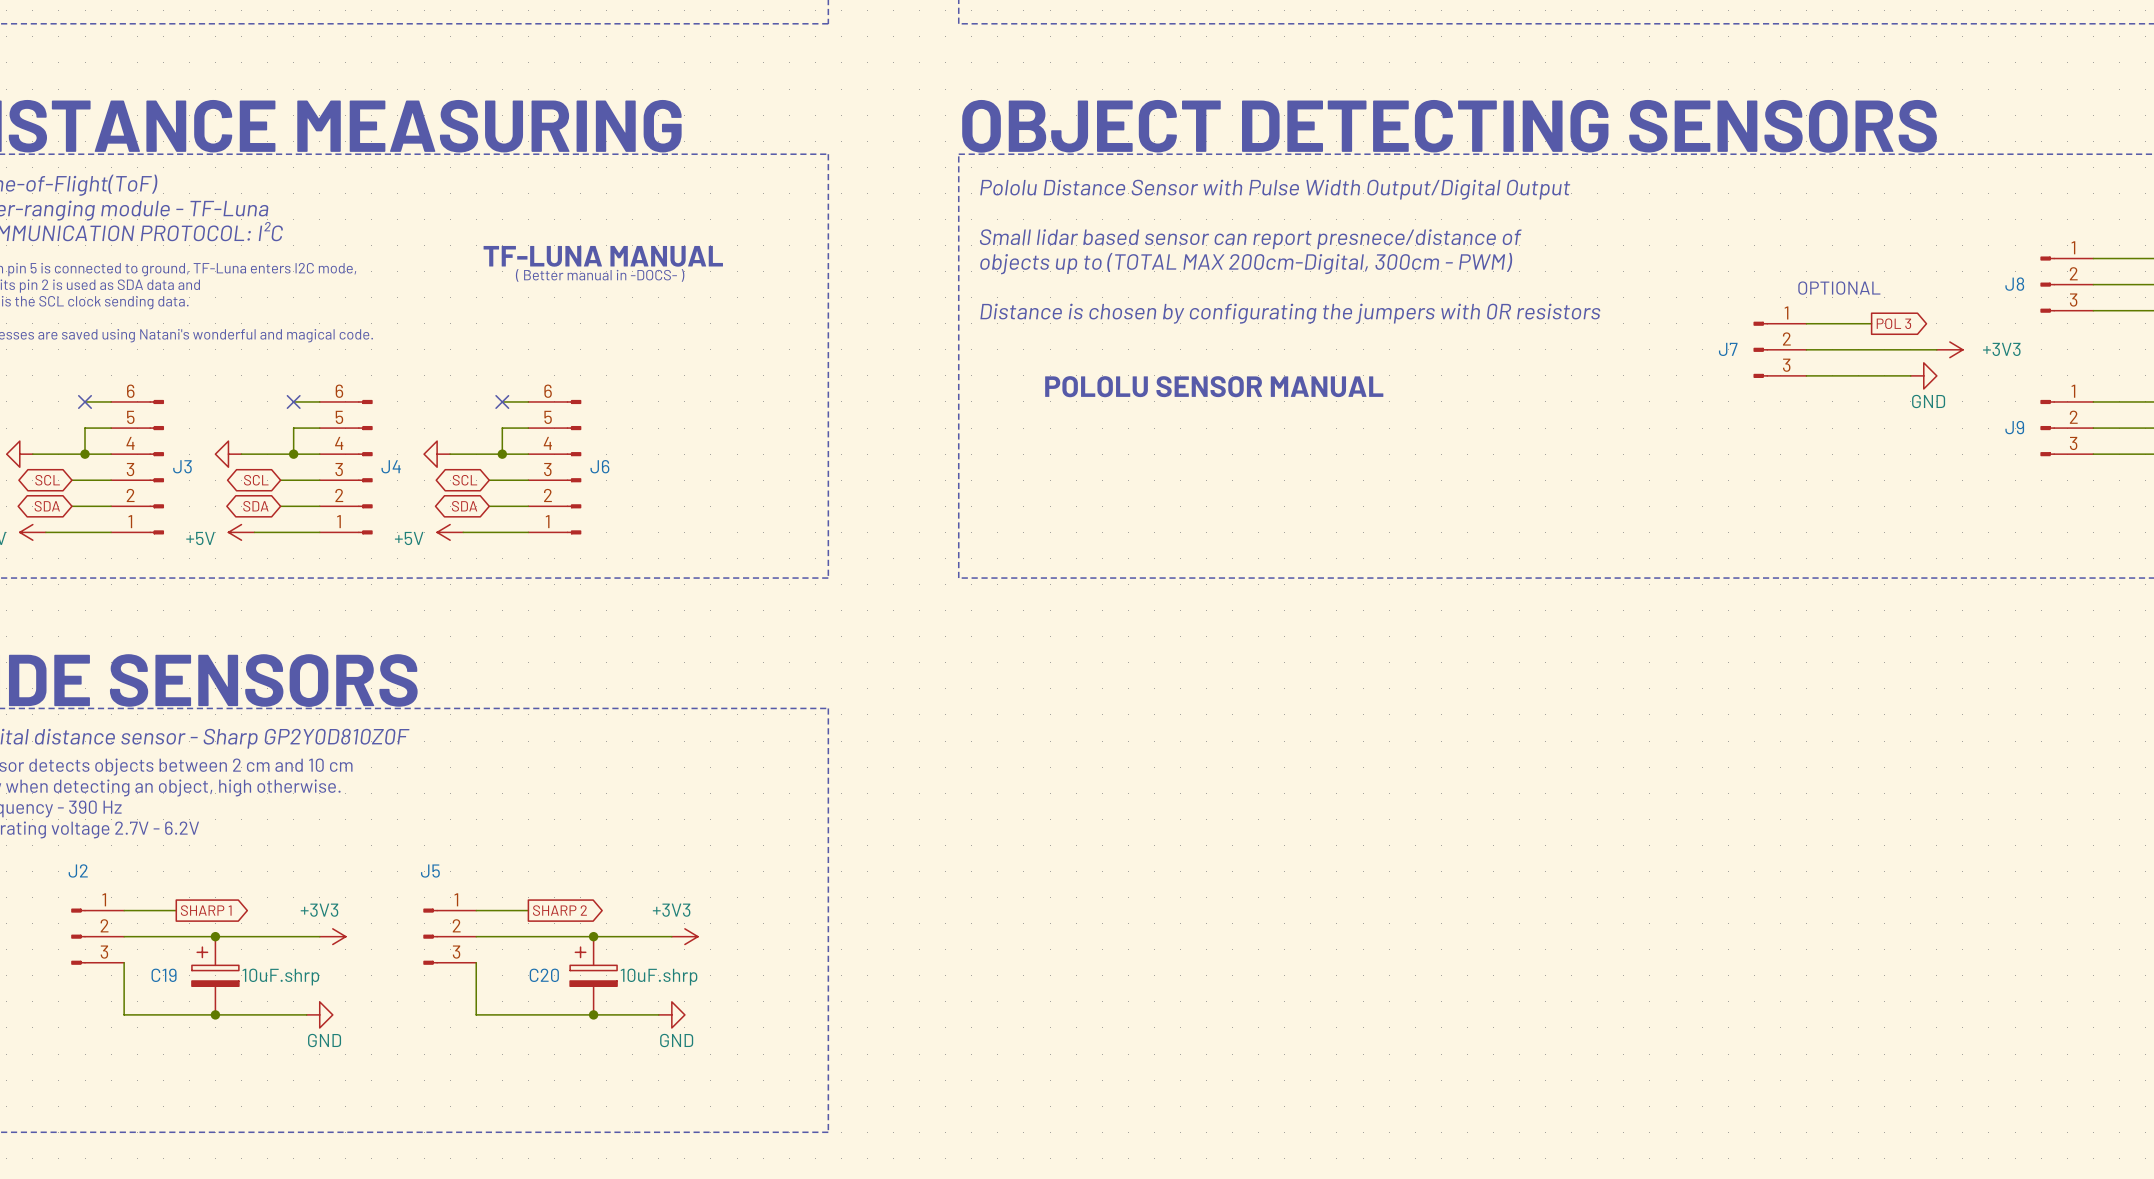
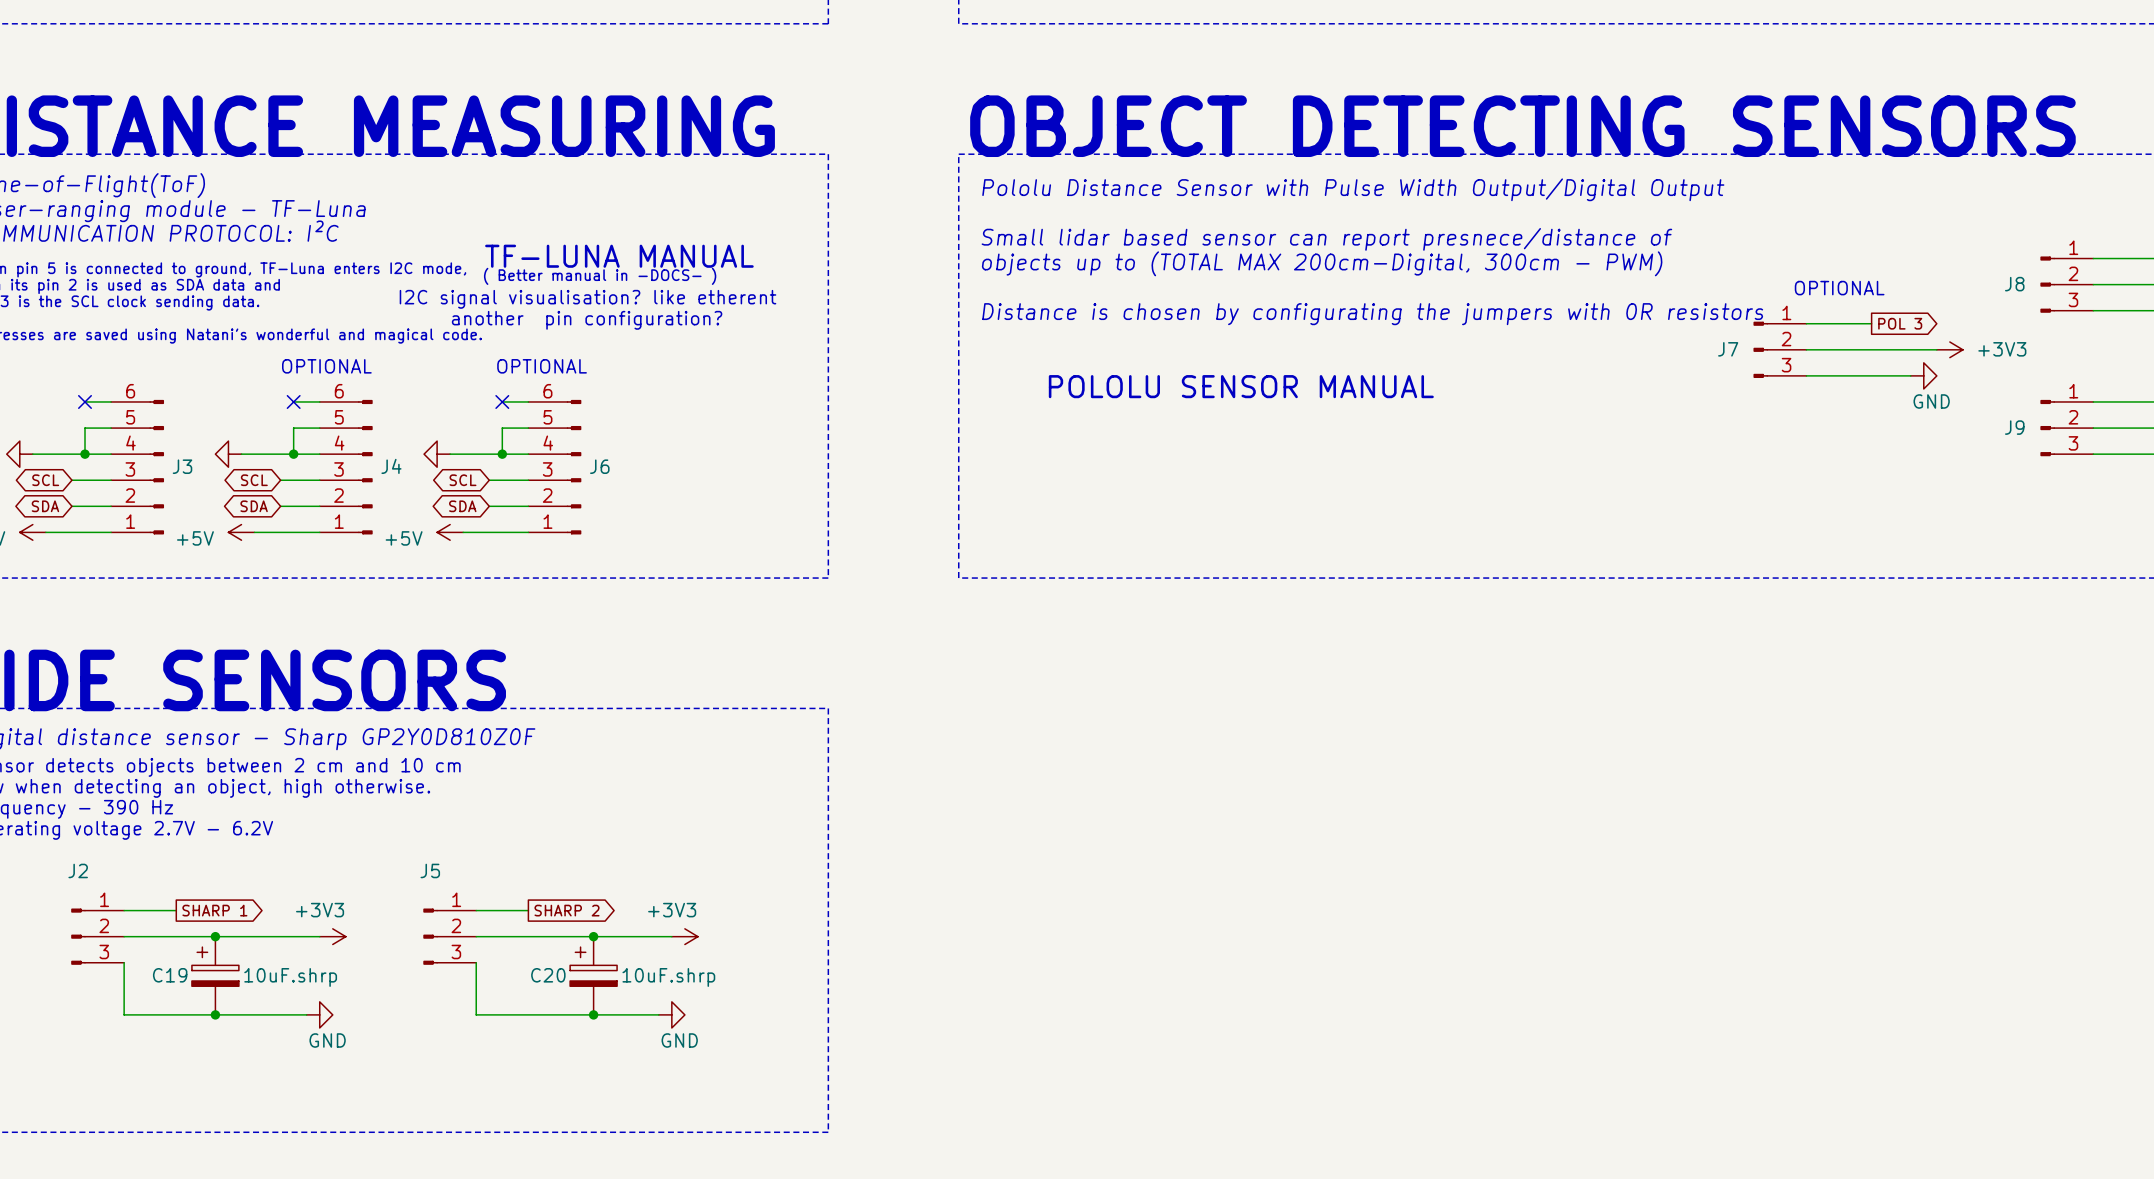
text: none -> I2C signal visualisation? like etherent (588, 299)
text: none -> another pin configuration? (587, 320)
text: none -> OPTIONAL (326, 366)
text: none -> OPTIONAL (542, 366)

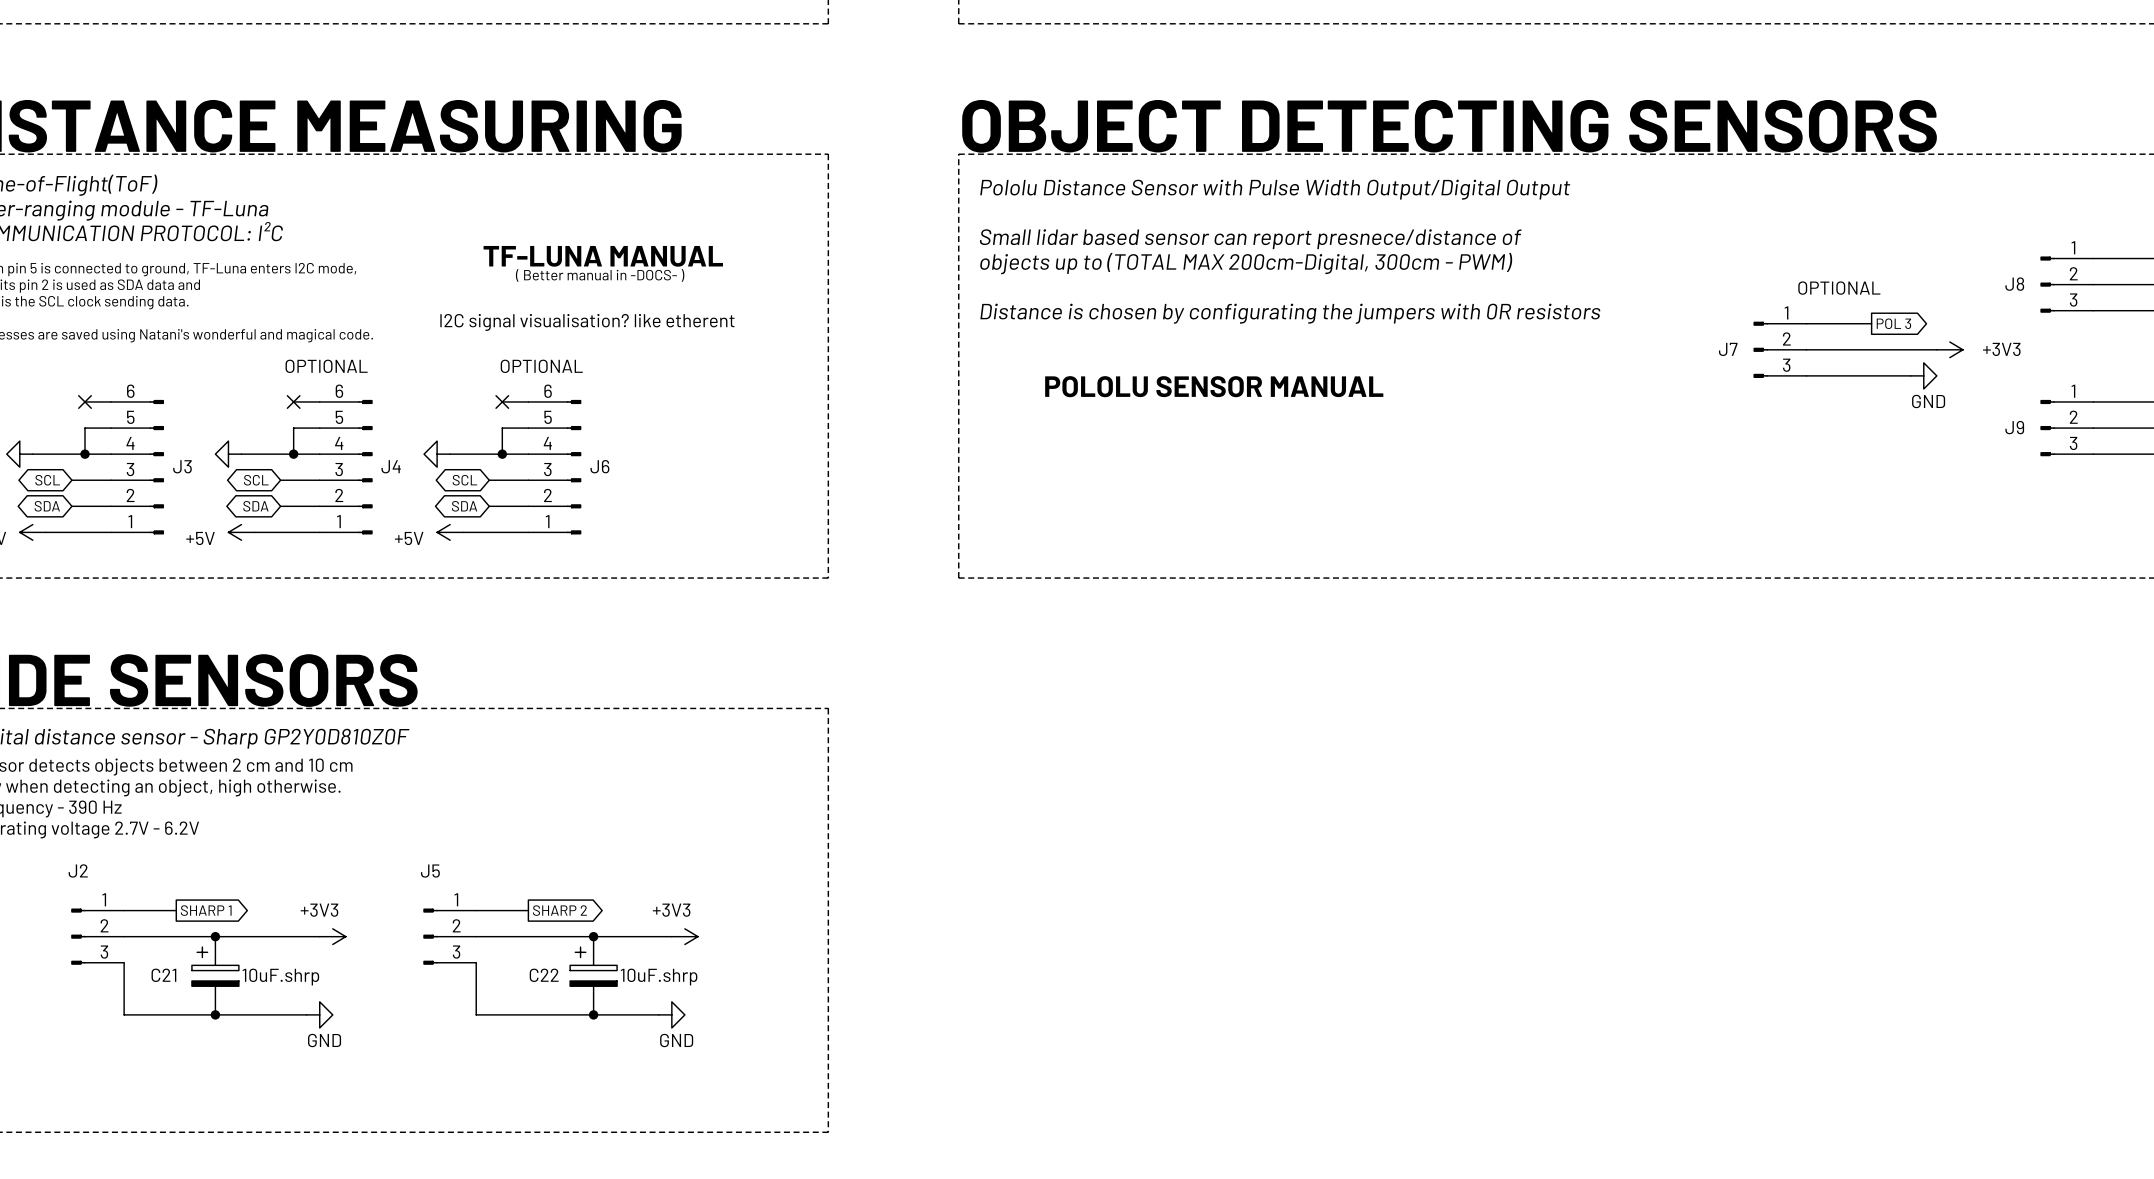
text: I2C signal visualisation? like etherent (588, 299) -> none
text: another pin configuration? (587, 320) -> I2C signal visualisation? like etherent (587, 322)
C19 name: C19 (170, 975) -> C21 (163, 975)
C20 name: C20 (548, 975) -> C22 (544, 975)

